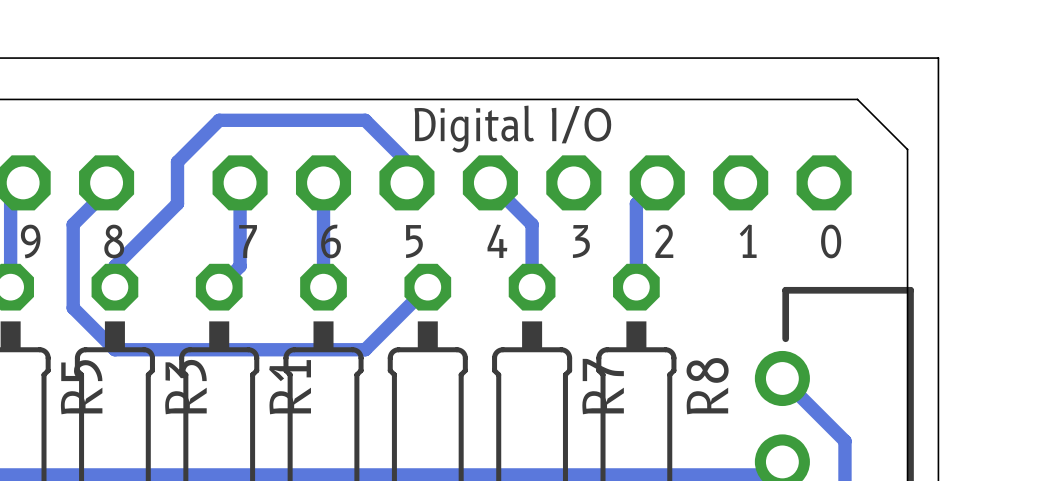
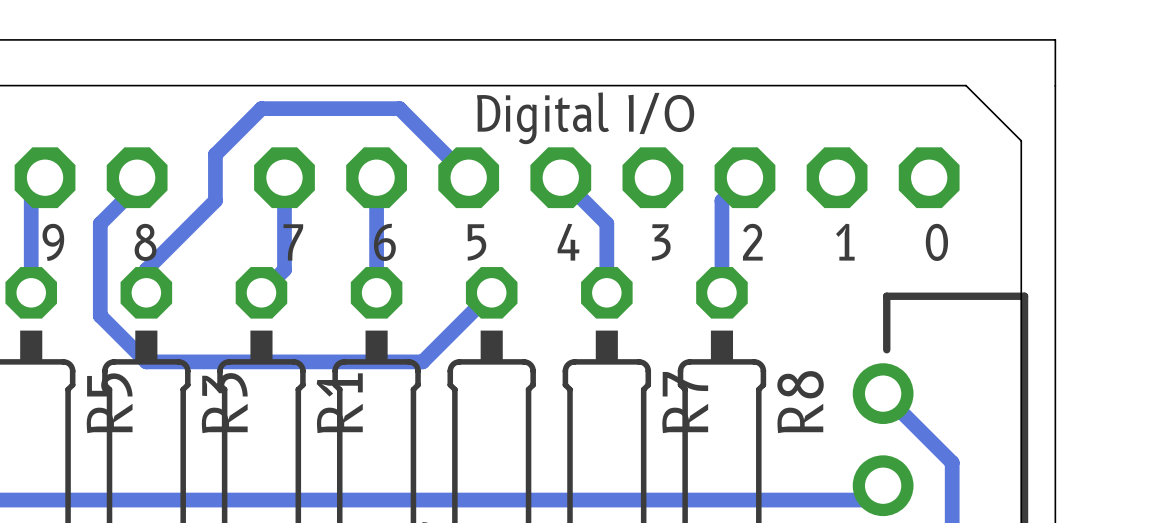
bottom track: (344, 120) (365, 120) (406, 162) (406, 182) -> (399, 108) (468, 177)

